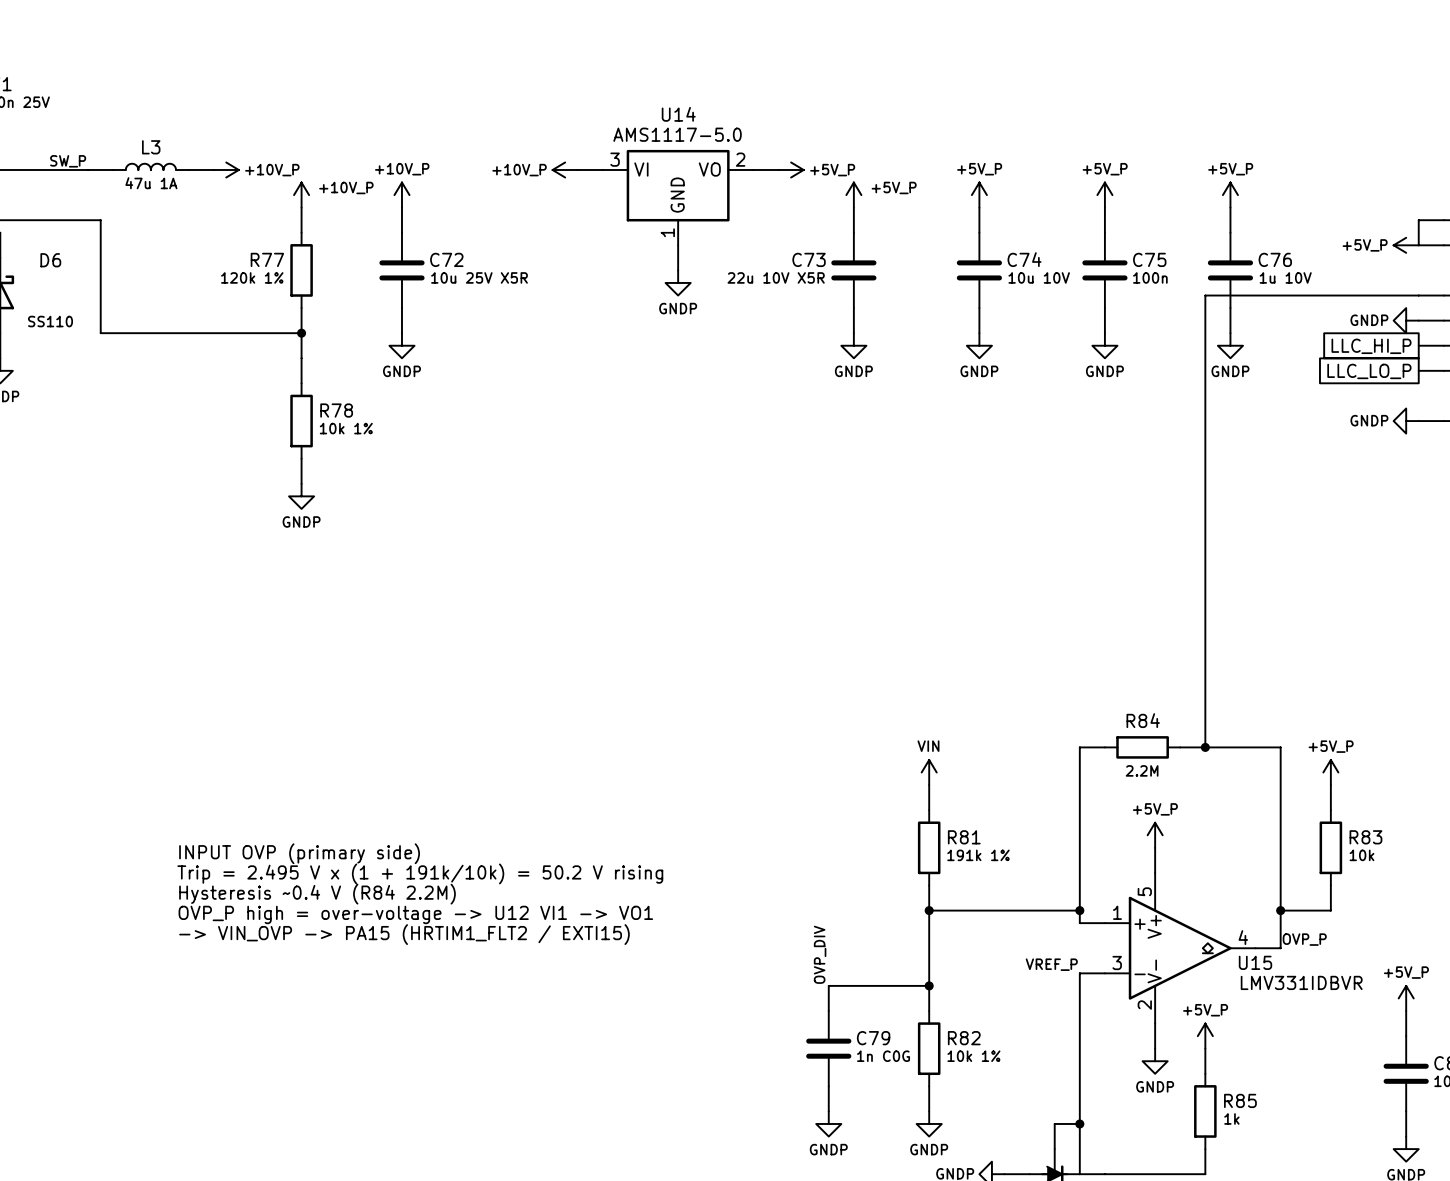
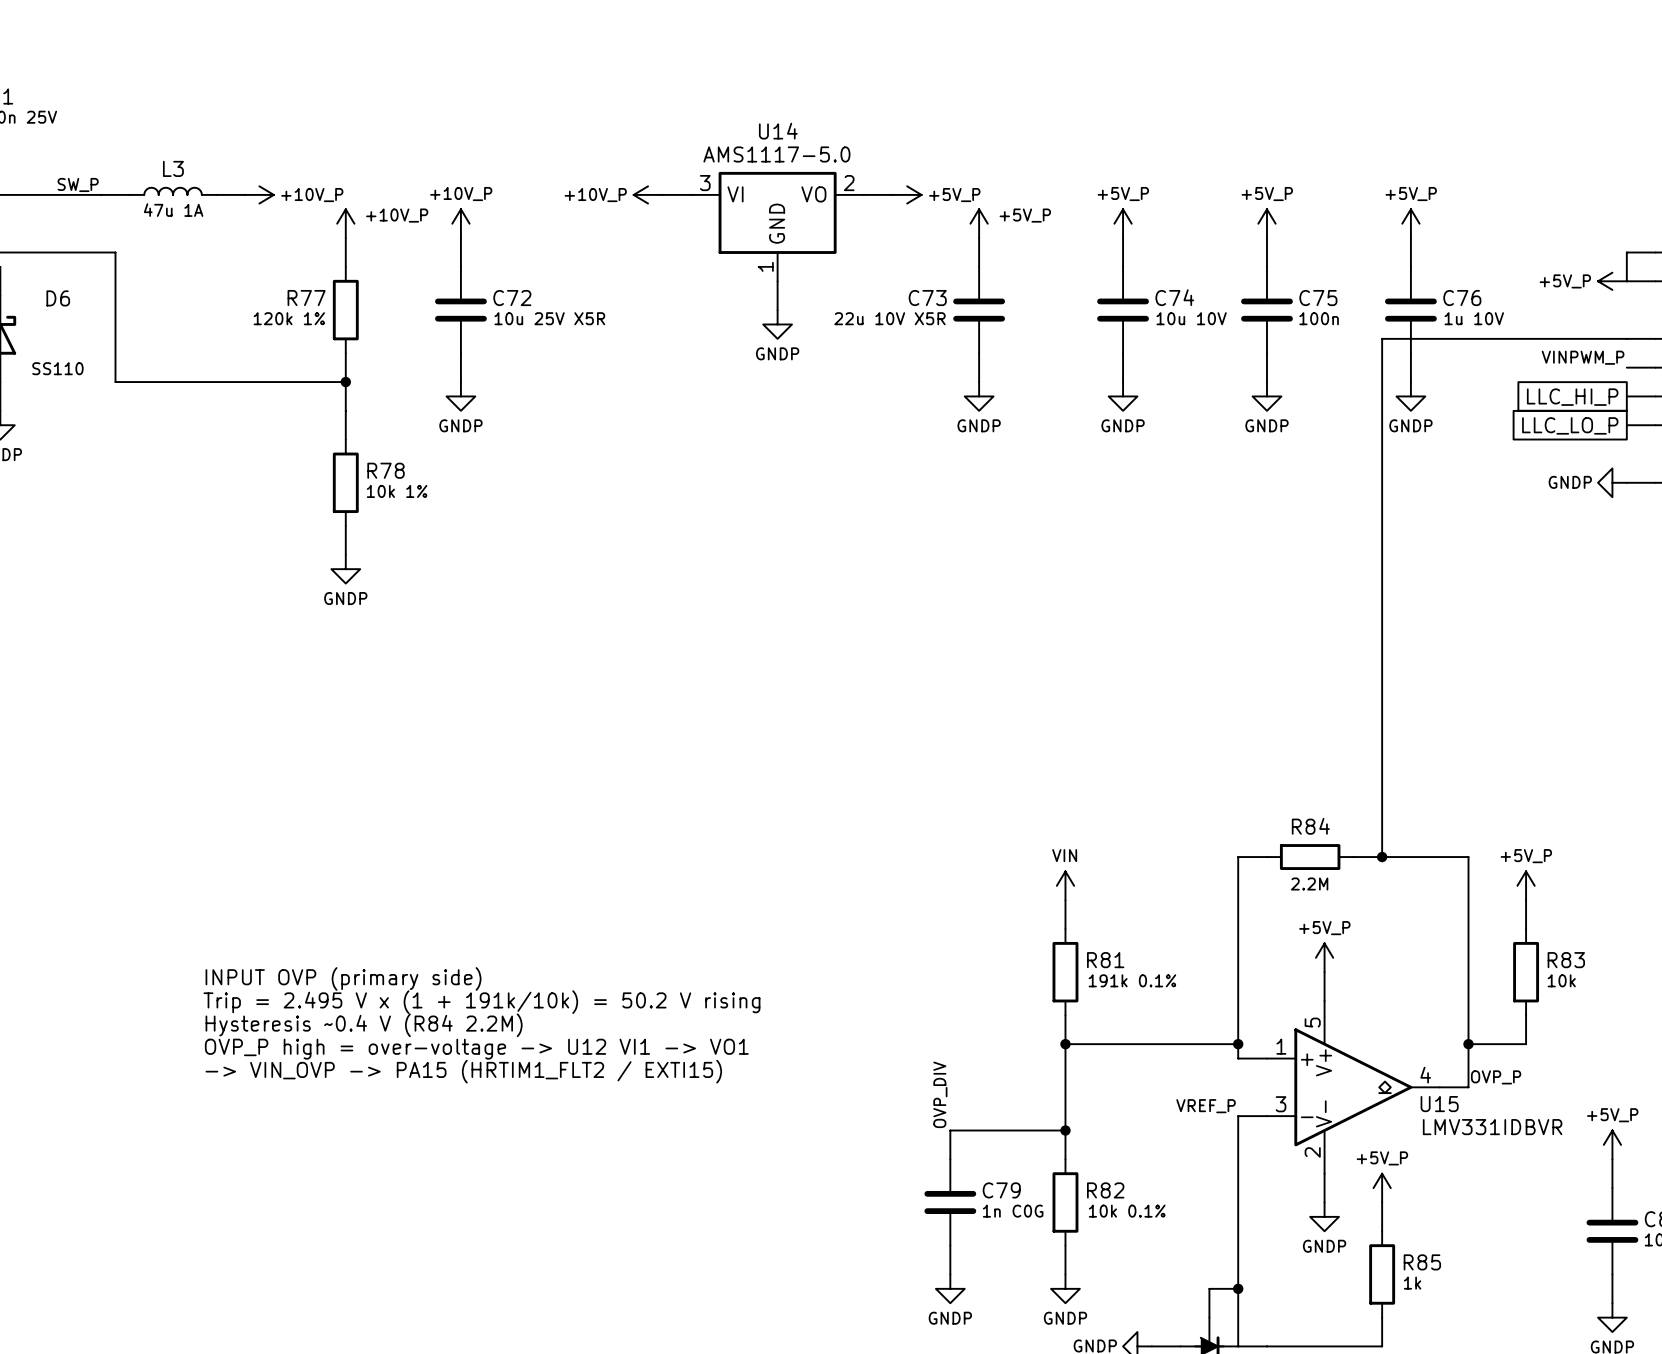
label: none -> VINPWM_P (1583, 357)
power symbol: GNDP (1406, 320) -> none
R81 value: 191k 1% (978, 855) -> 191k 0.1% (1132, 980)
R82 value: 10k 1% (973, 1056) -> 10k 0.1% (1127, 1211)

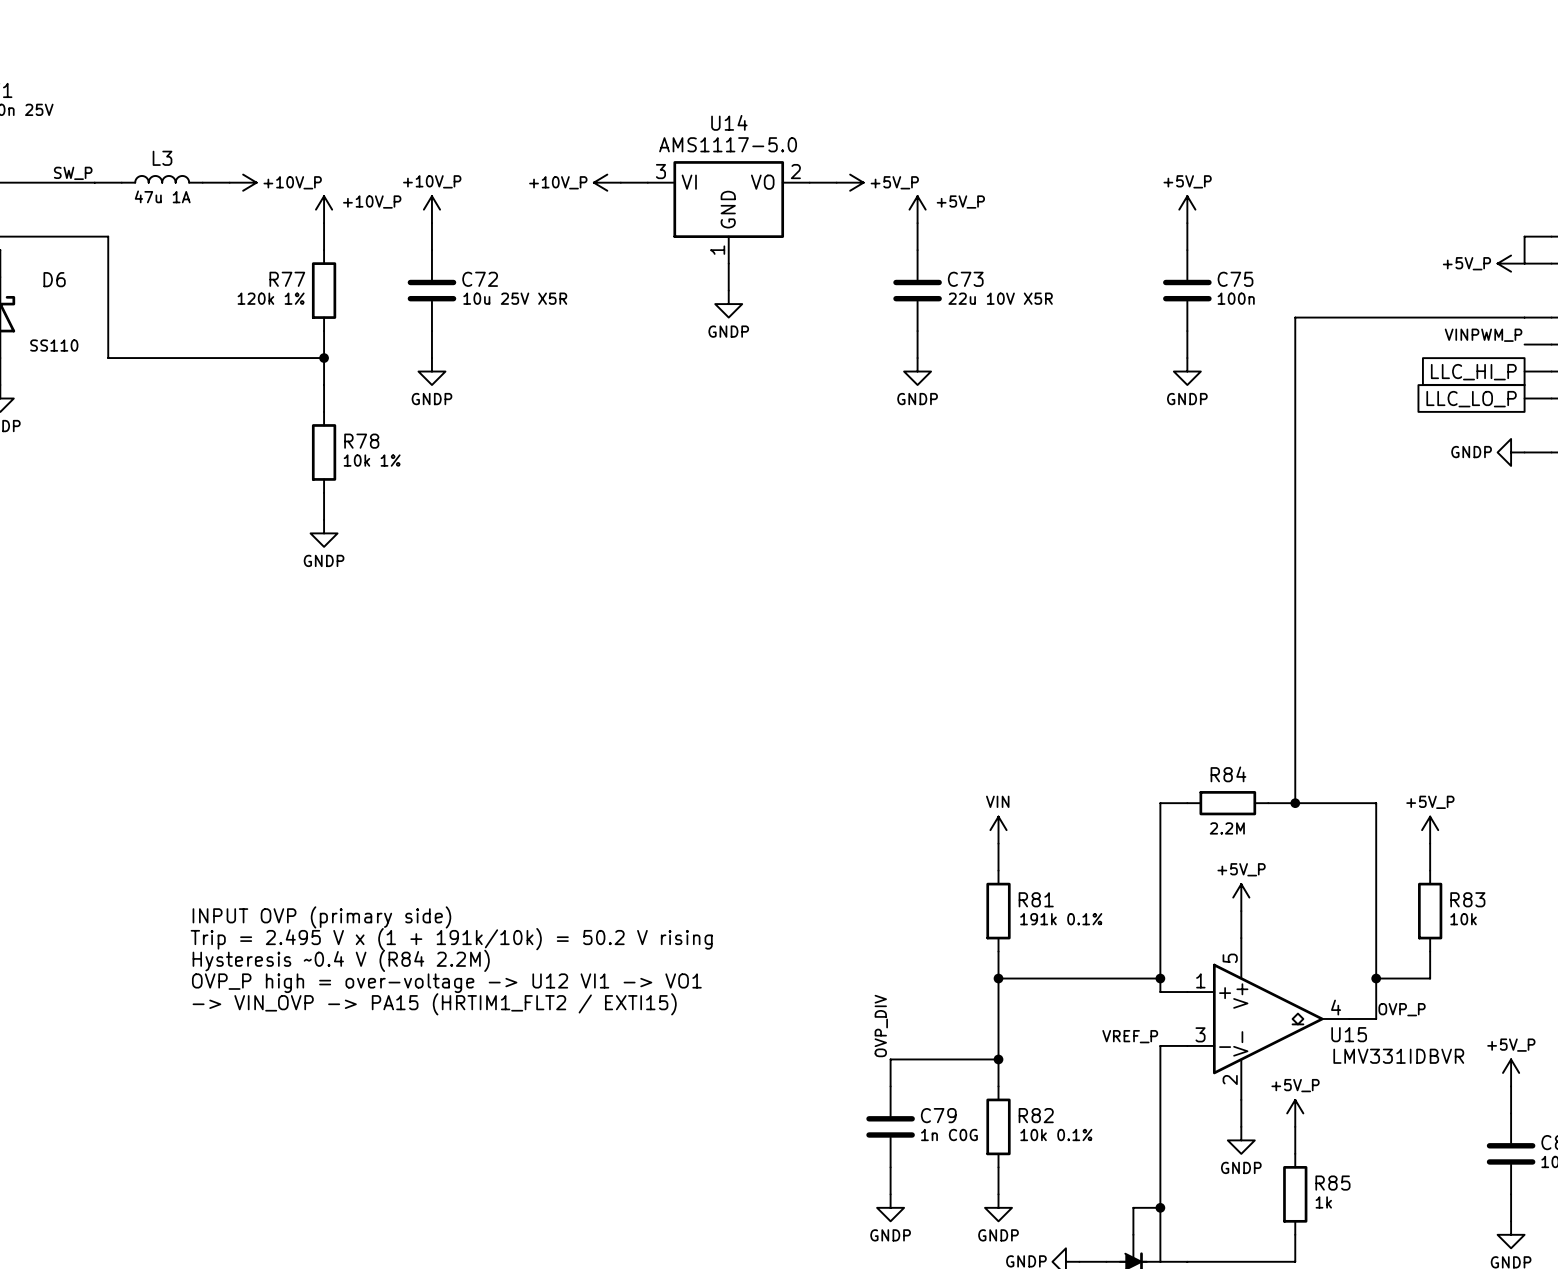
power symbol: +5V_P (1123, 223) -> none
power symbol: +5V_P (1410, 223) -> none
wire: (1123, 238) (1123, 266) -> none
wire: (1410, 238) (1410, 266) -> none
C73 name position: C73 (927, 298) -> C73 (965, 279)
C74: 10u 10V (1123, 310) -> none
C76: 1u 10V (1410, 310) -> none
C73 value position: 22u 10V X5R (889, 318) -> 22u 10V X5R (1000, 298)
wire: (1123, 353) (1123, 382) -> none
wire: (1410, 353) (1410, 382) -> none
power symbol: GNDP (1123, 396) -> none
power symbol: GNDP (1410, 396) -> none

